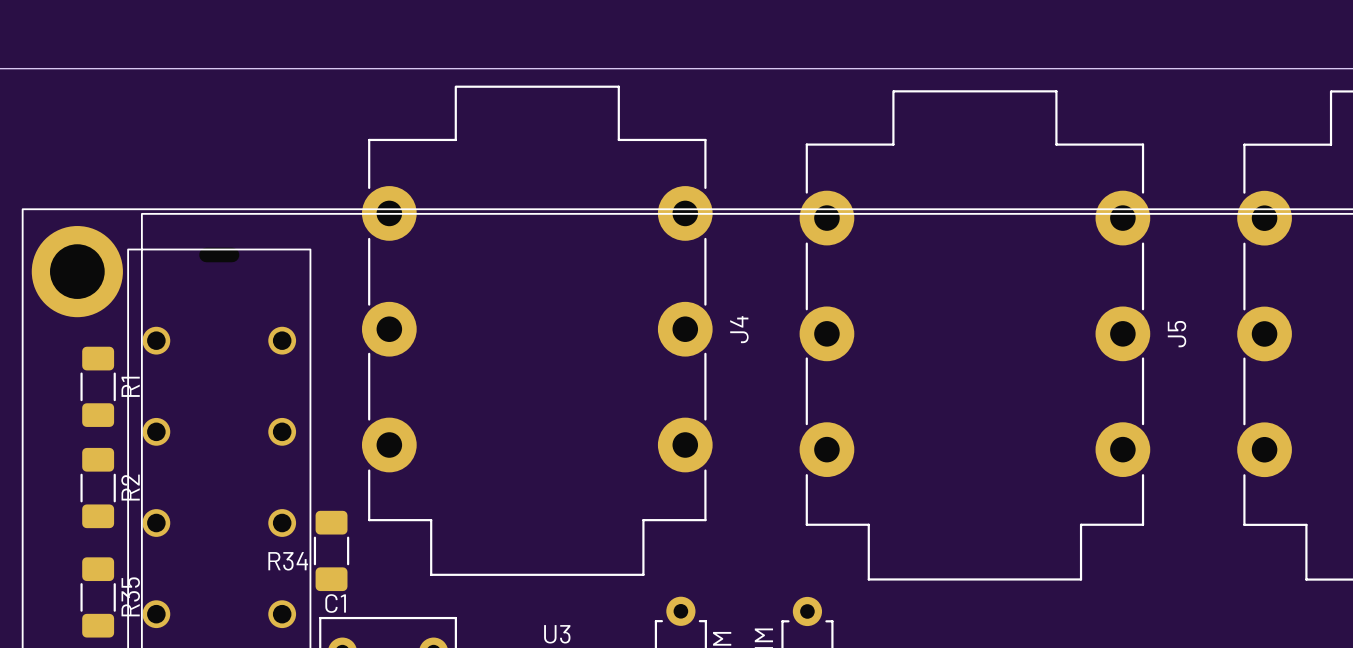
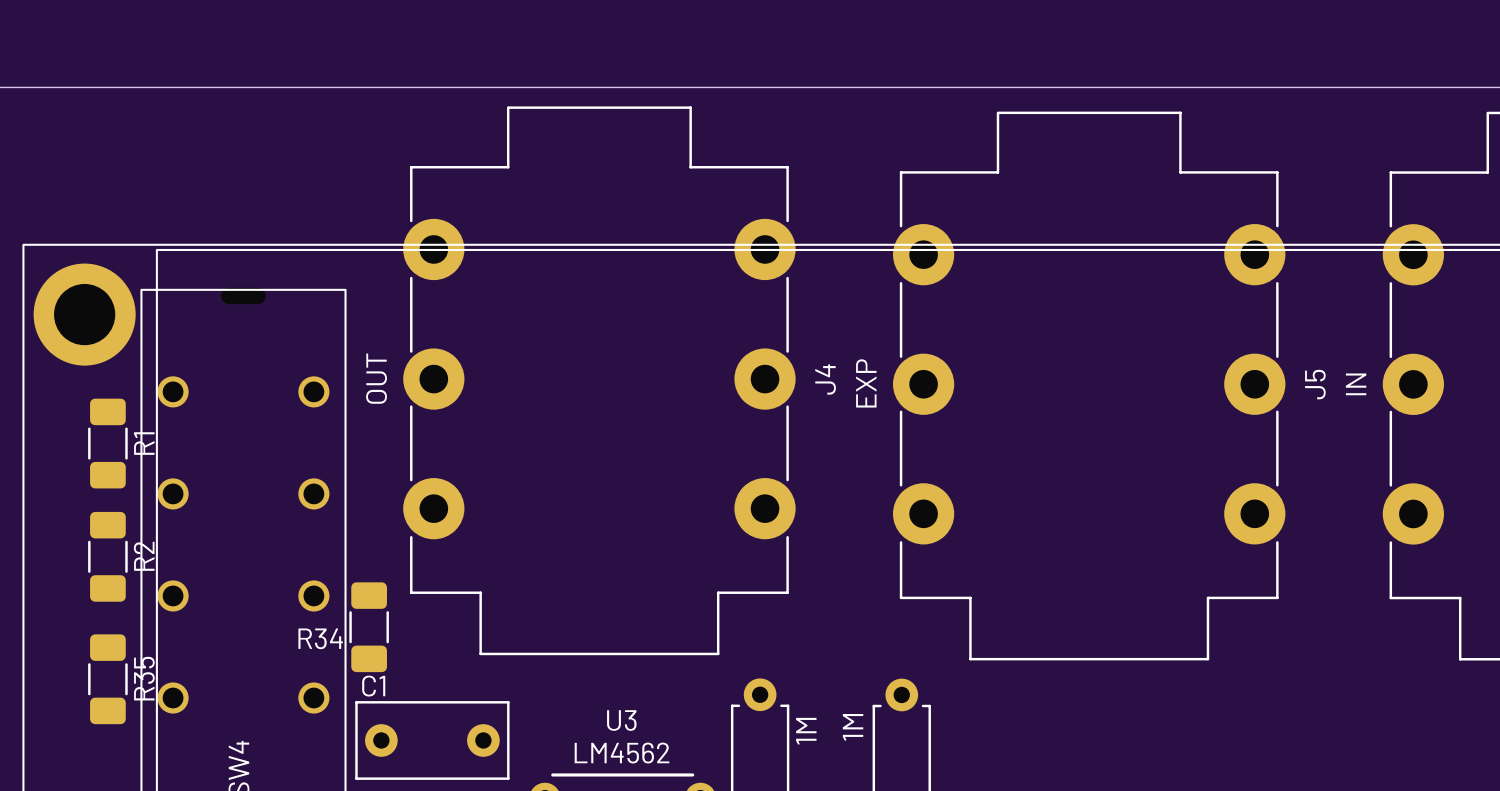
J4 value: none -> OUT (376, 378)
J5 value: none -> EXP (866, 383)
part value: none -> IN (1356, 384)

